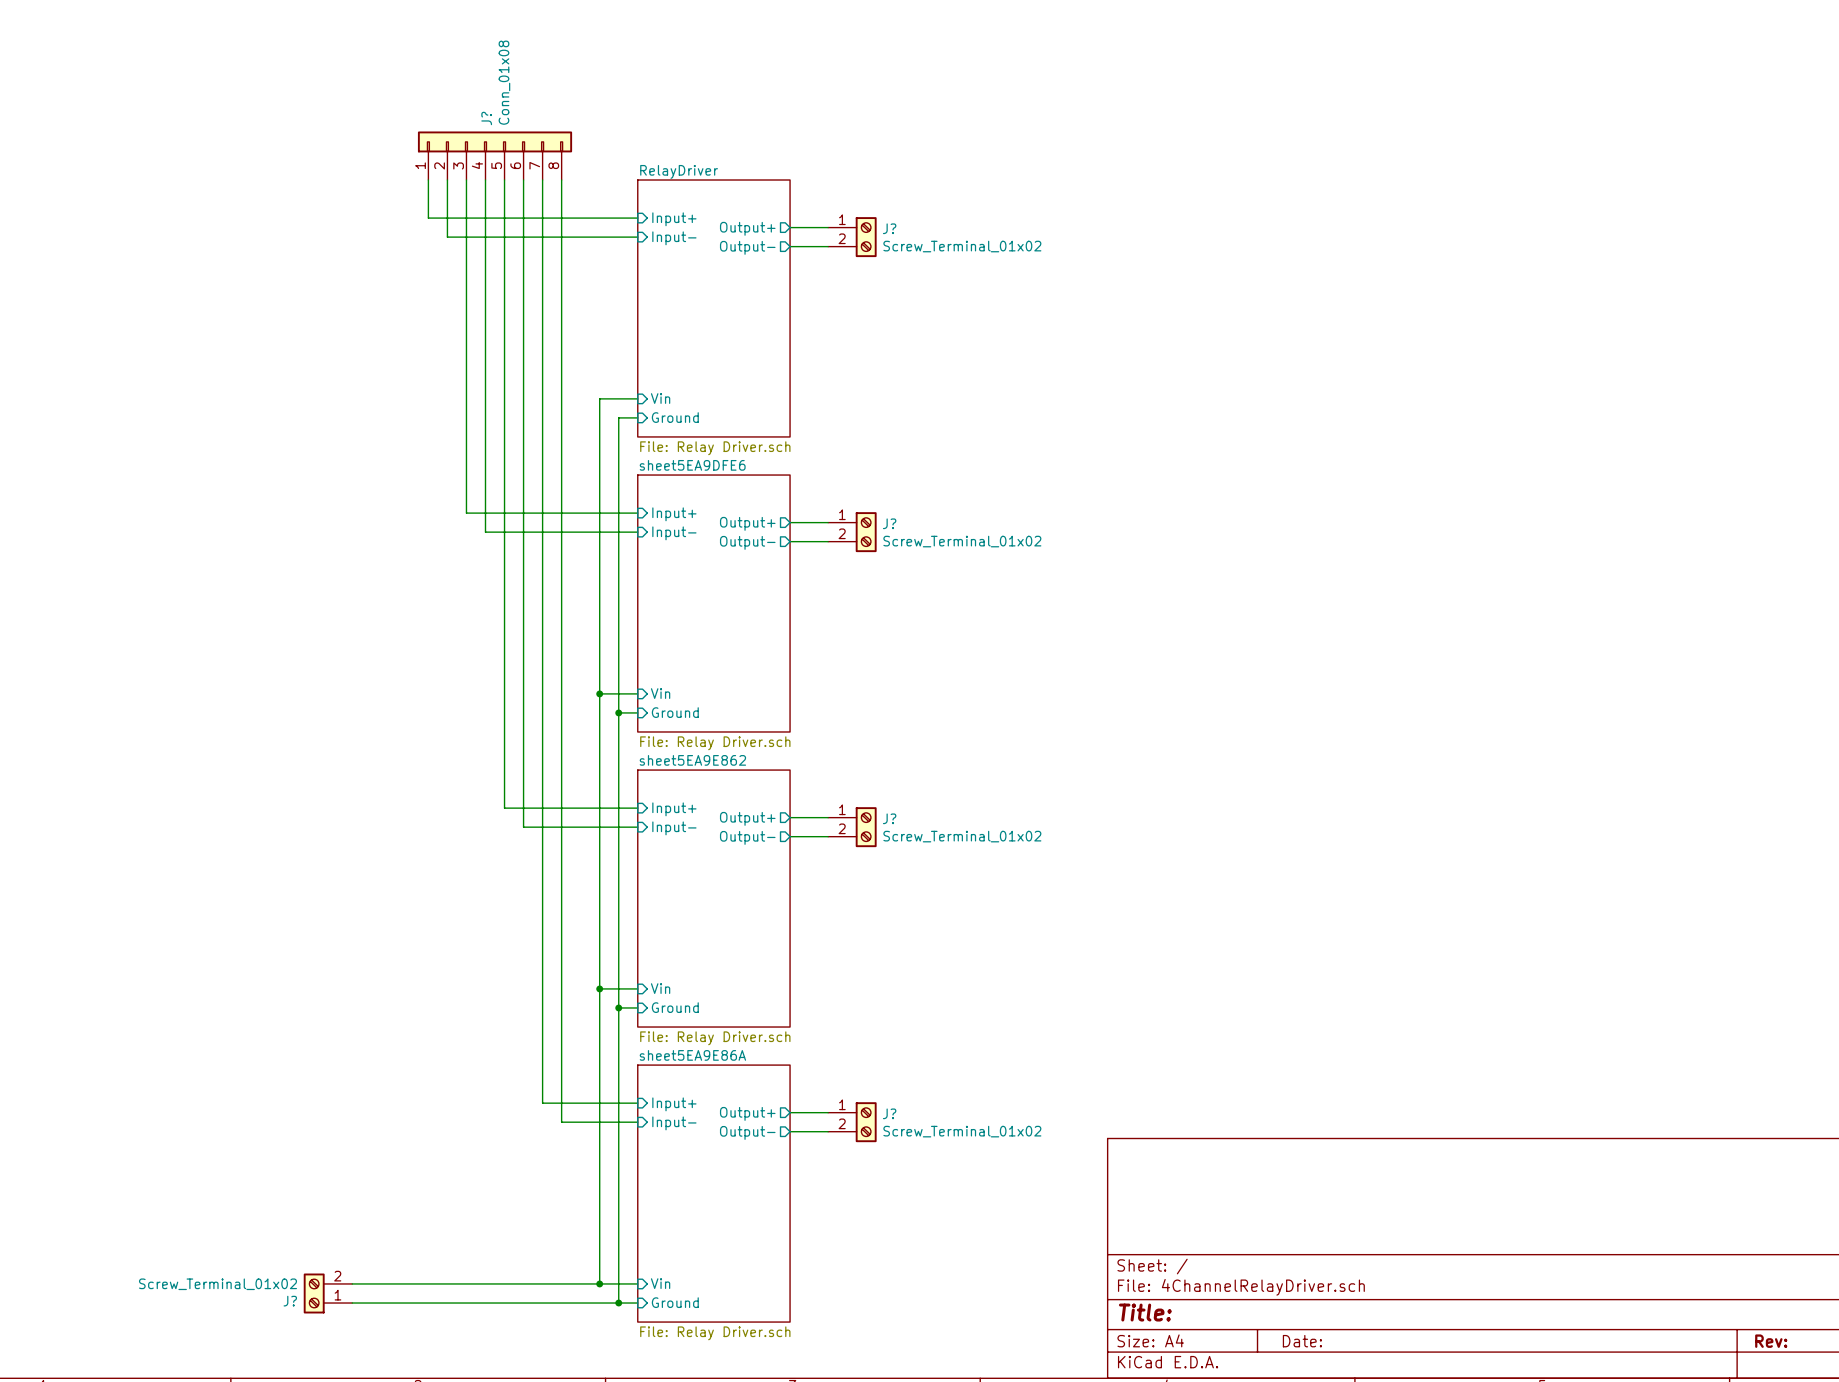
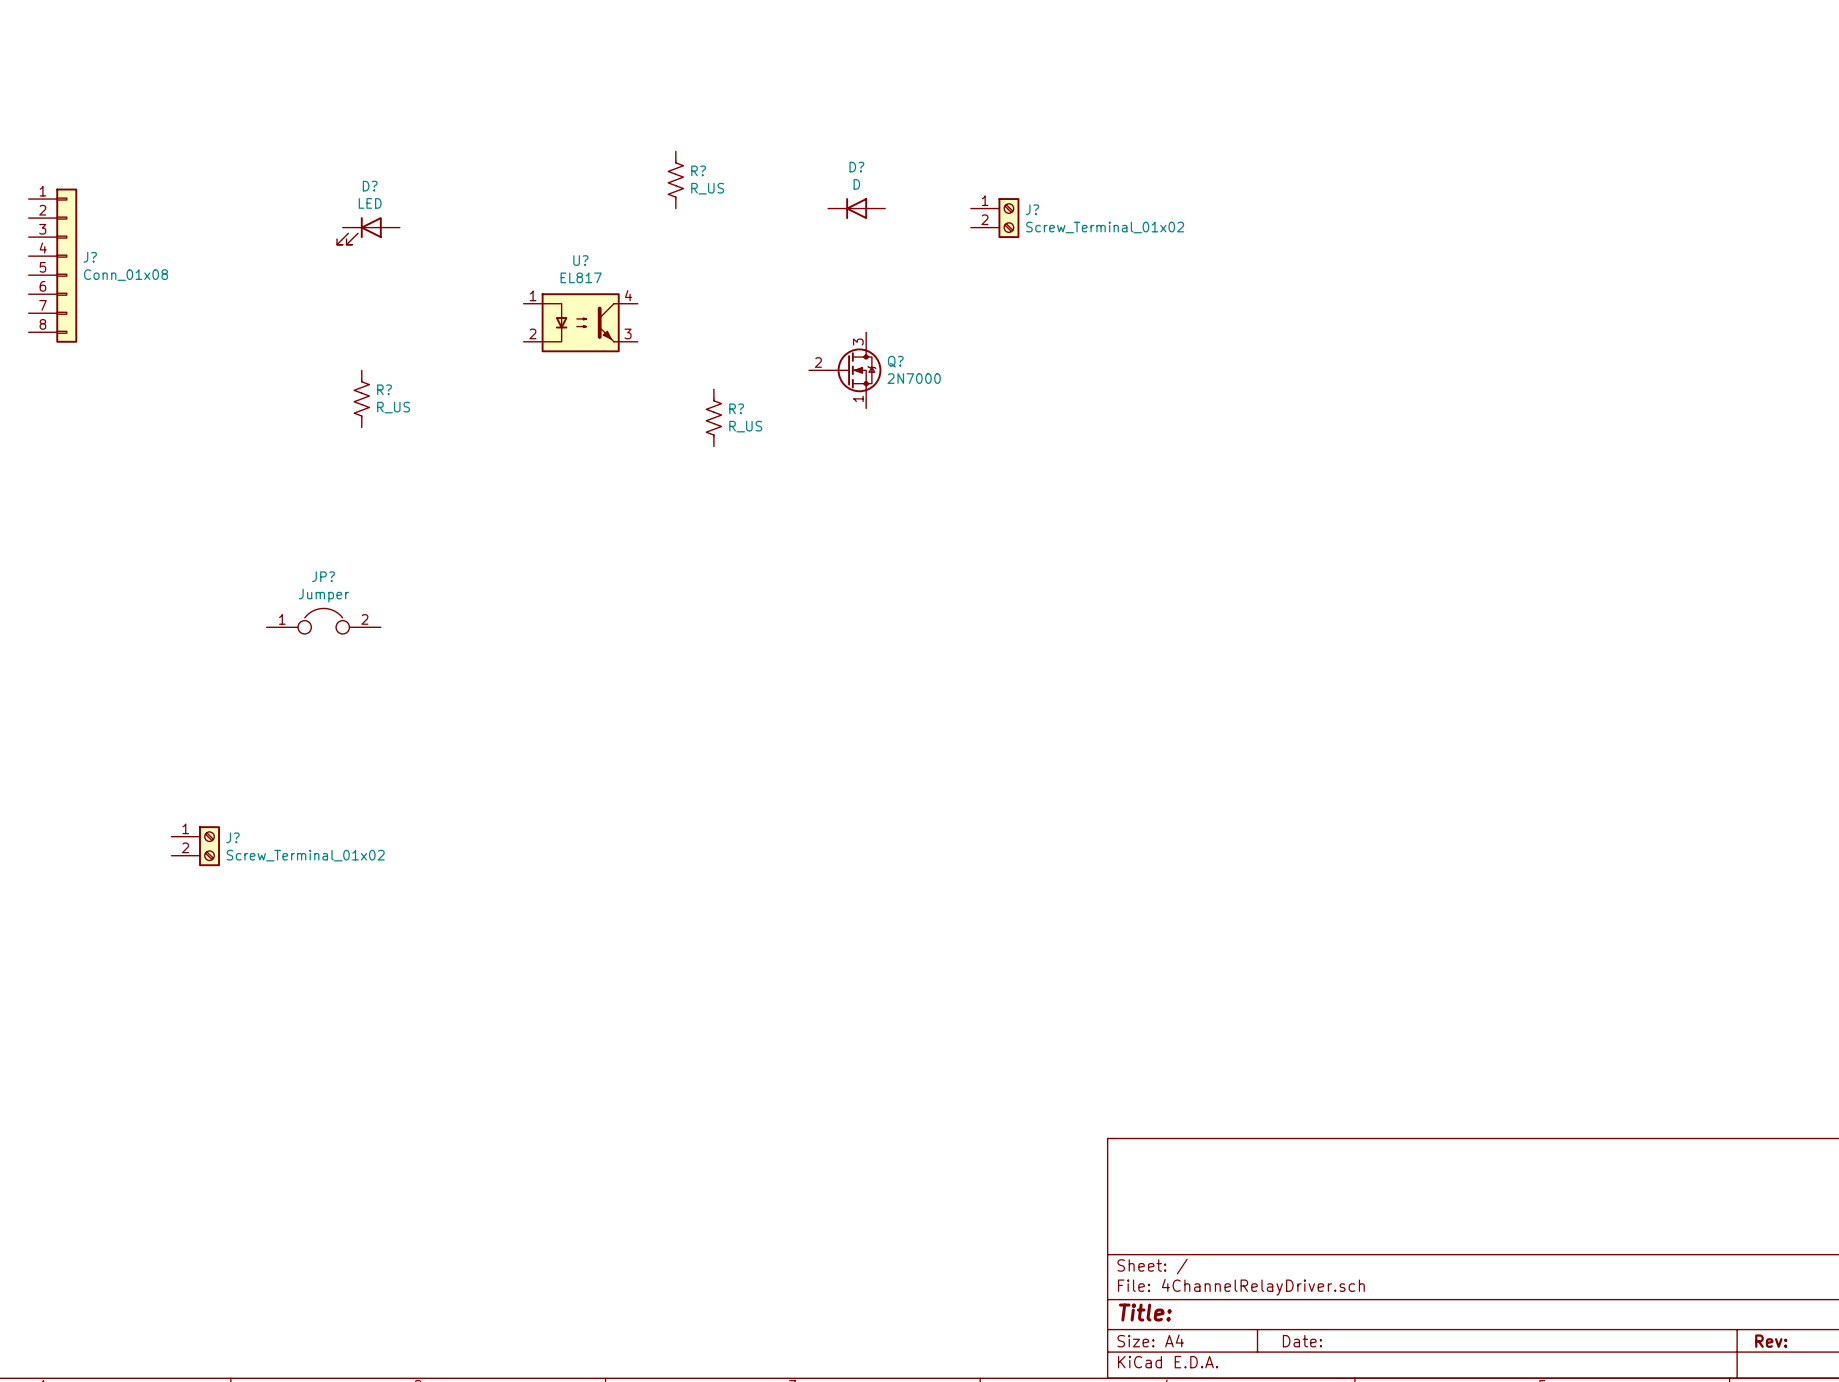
J?: Conn_01x08 (495, 155) -> none
wire: (428, 180) (428, 218) (637, 218) -> none
wire: (447, 180) (447, 237) (637, 237) -> none
wire: (466, 180) (466, 513) (637, 513) -> none
wire: (485, 180) (485, 532) (637, 532) -> none
wire: (504, 180) (504, 808) (637, 808) -> none
wire: (523, 180) (523, 827) (637, 827) -> none
wire: (542, 180) (542, 1103) (637, 1103) -> none
wire: (561, 180) (561, 1122) (637, 1122) -> none
R?: none -> R_US (675, 180)
D?: none -> D (856, 208)
sheet pin: Input+ (674, 219) -> none
wire: (790, 227) (828, 227) -> none
sheet pin: Output+ (747, 228) -> none
D?: none -> LED (368, 230)
J? position: (852, 237) -> (995, 218)
sheet pin: Input- (674, 238) -> none
wire: (790, 246) (828, 246) -> none
sheet pin: Output- (747, 247) -> none
J?: none -> Conn_01x08 (52, 265)
sheet RelayDriver: File: Relay Driver.sch (713, 308) -> none
U?: none -> EL817 (580, 322)
Q?: none -> 2N7000 (845, 370)
R?: none -> R_US (361, 398)
wire: (637, 398) (599, 398) (599, 1283) -> none
sheet pin: Vin (660, 398) -> none
wire: (637, 417) (618, 417) (618, 1303) -> none
sheet pin: Ground (675, 417) -> none
R?: none -> R_US (713, 417)
sheet pin: Input+ (674, 514) -> none
wire: (790, 522) (828, 522) -> none
sheet pin: Output+ (747, 523) -> none
J?: Screw_Terminal_01x02 (852, 532) -> none
sheet pin: Input- (674, 533) -> none
wire: (790, 541) (828, 541) -> none
sheet pin: Output- (747, 542) -> none
sheet sheet5EA9DFE6: File: Relay Driver.sch (713, 603) -> none
JP?: none -> Jumper (323, 621)
wire: (599, 693) (637, 693) -> none
junction: (599, 693) -> none
sheet pin: Vin (660, 693) -> none
wire: (618, 712) (637, 712) -> none
junction: (618, 712) -> none
sheet pin: Ground (675, 712) -> none
sheet pin: Input+ (674, 809) -> none
wire: (790, 817) (828, 817) -> none
sheet pin: Output+ (747, 818) -> none
J?: Screw_Terminal_01x02 (852, 827) -> none
sheet pin: Input- (674, 828) -> none
wire: (790, 836) (828, 836) -> none
sheet pin: Output- (747, 837) -> none
J?: none -> Screw_Terminal_01x02 (195, 846)
sheet sheet5EA9E862: File: Relay Driver.sch (713, 898) -> none
wire: (599, 988) (637, 988) -> none
junction: (599, 988) -> none
sheet pin: Vin (660, 988) -> none
wire: (618, 1007) (637, 1007) -> none
junction: (618, 1007) -> none
sheet pin: Ground (675, 1007) -> none
sheet pin: Input+ (674, 1104) -> none
wire: (790, 1112) (828, 1112) -> none
sheet pin: Output+ (747, 1113) -> none
J?: Screw_Terminal_01x02 (852, 1122) -> none
sheet pin: Input- (674, 1123) -> none
wire: (790, 1131) (828, 1131) -> none
sheet pin: Output- (747, 1132) -> none
sheet sheet5EA9E86A: File: Relay Driver.sch (713, 1193) -> none
wire: (352, 1283) (637, 1283) -> none
junction: (599, 1283) -> none
sheet pin: Vin (660, 1283) -> none
J?: Screw_Terminal_01x02 (327, 1293) -> none
sheet pin: Ground (675, 1302) -> none
wire: (352, 1303) (637, 1303) -> none
junction: (618, 1303) -> none

